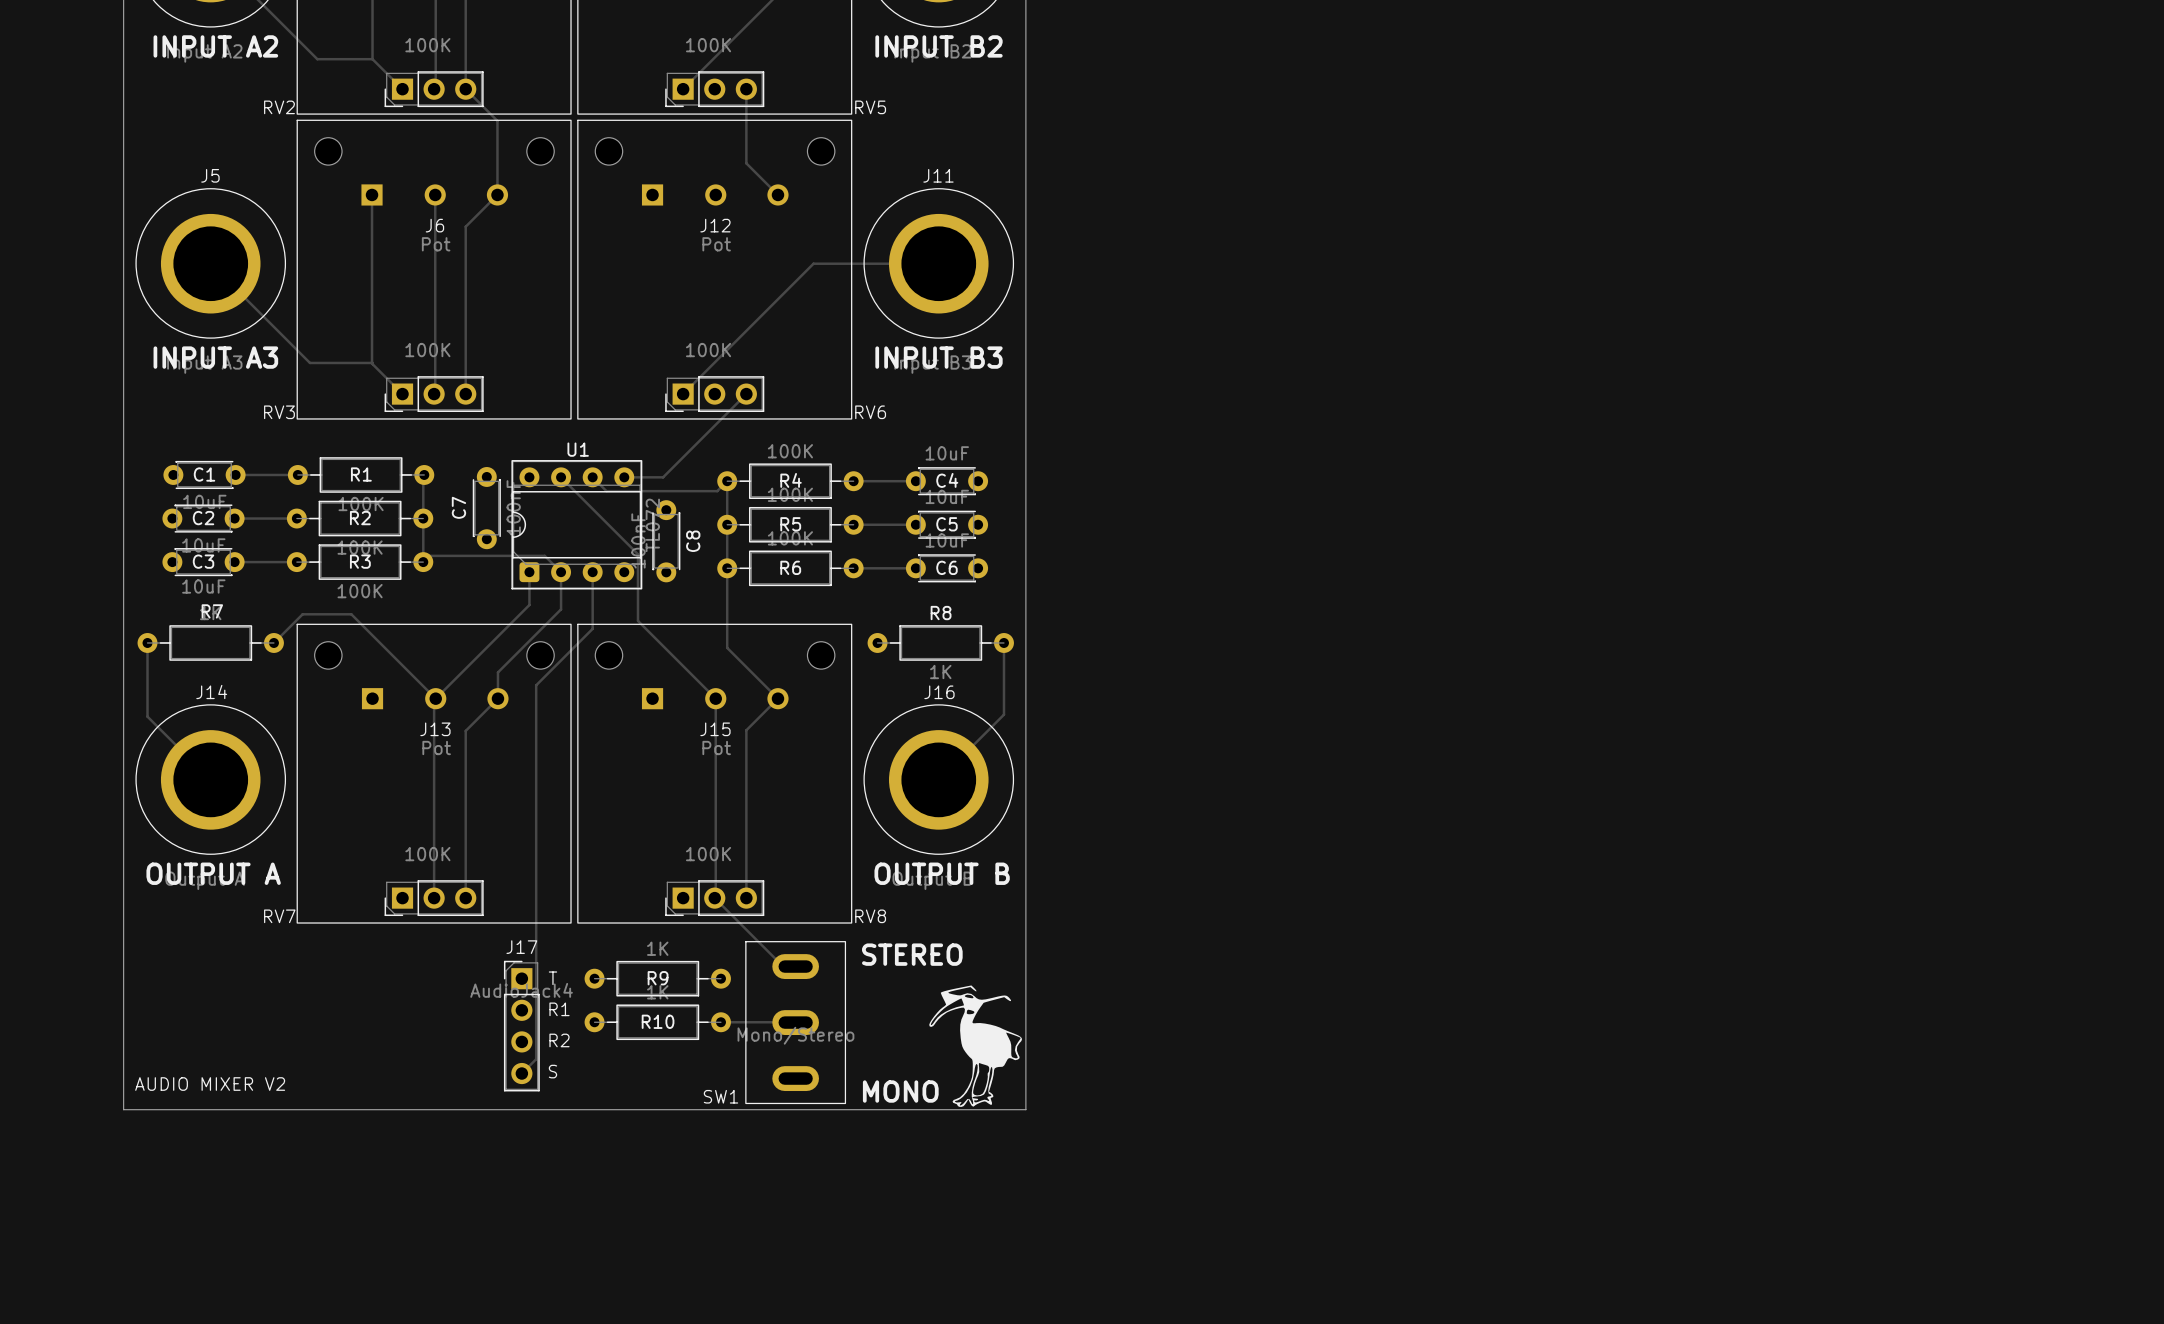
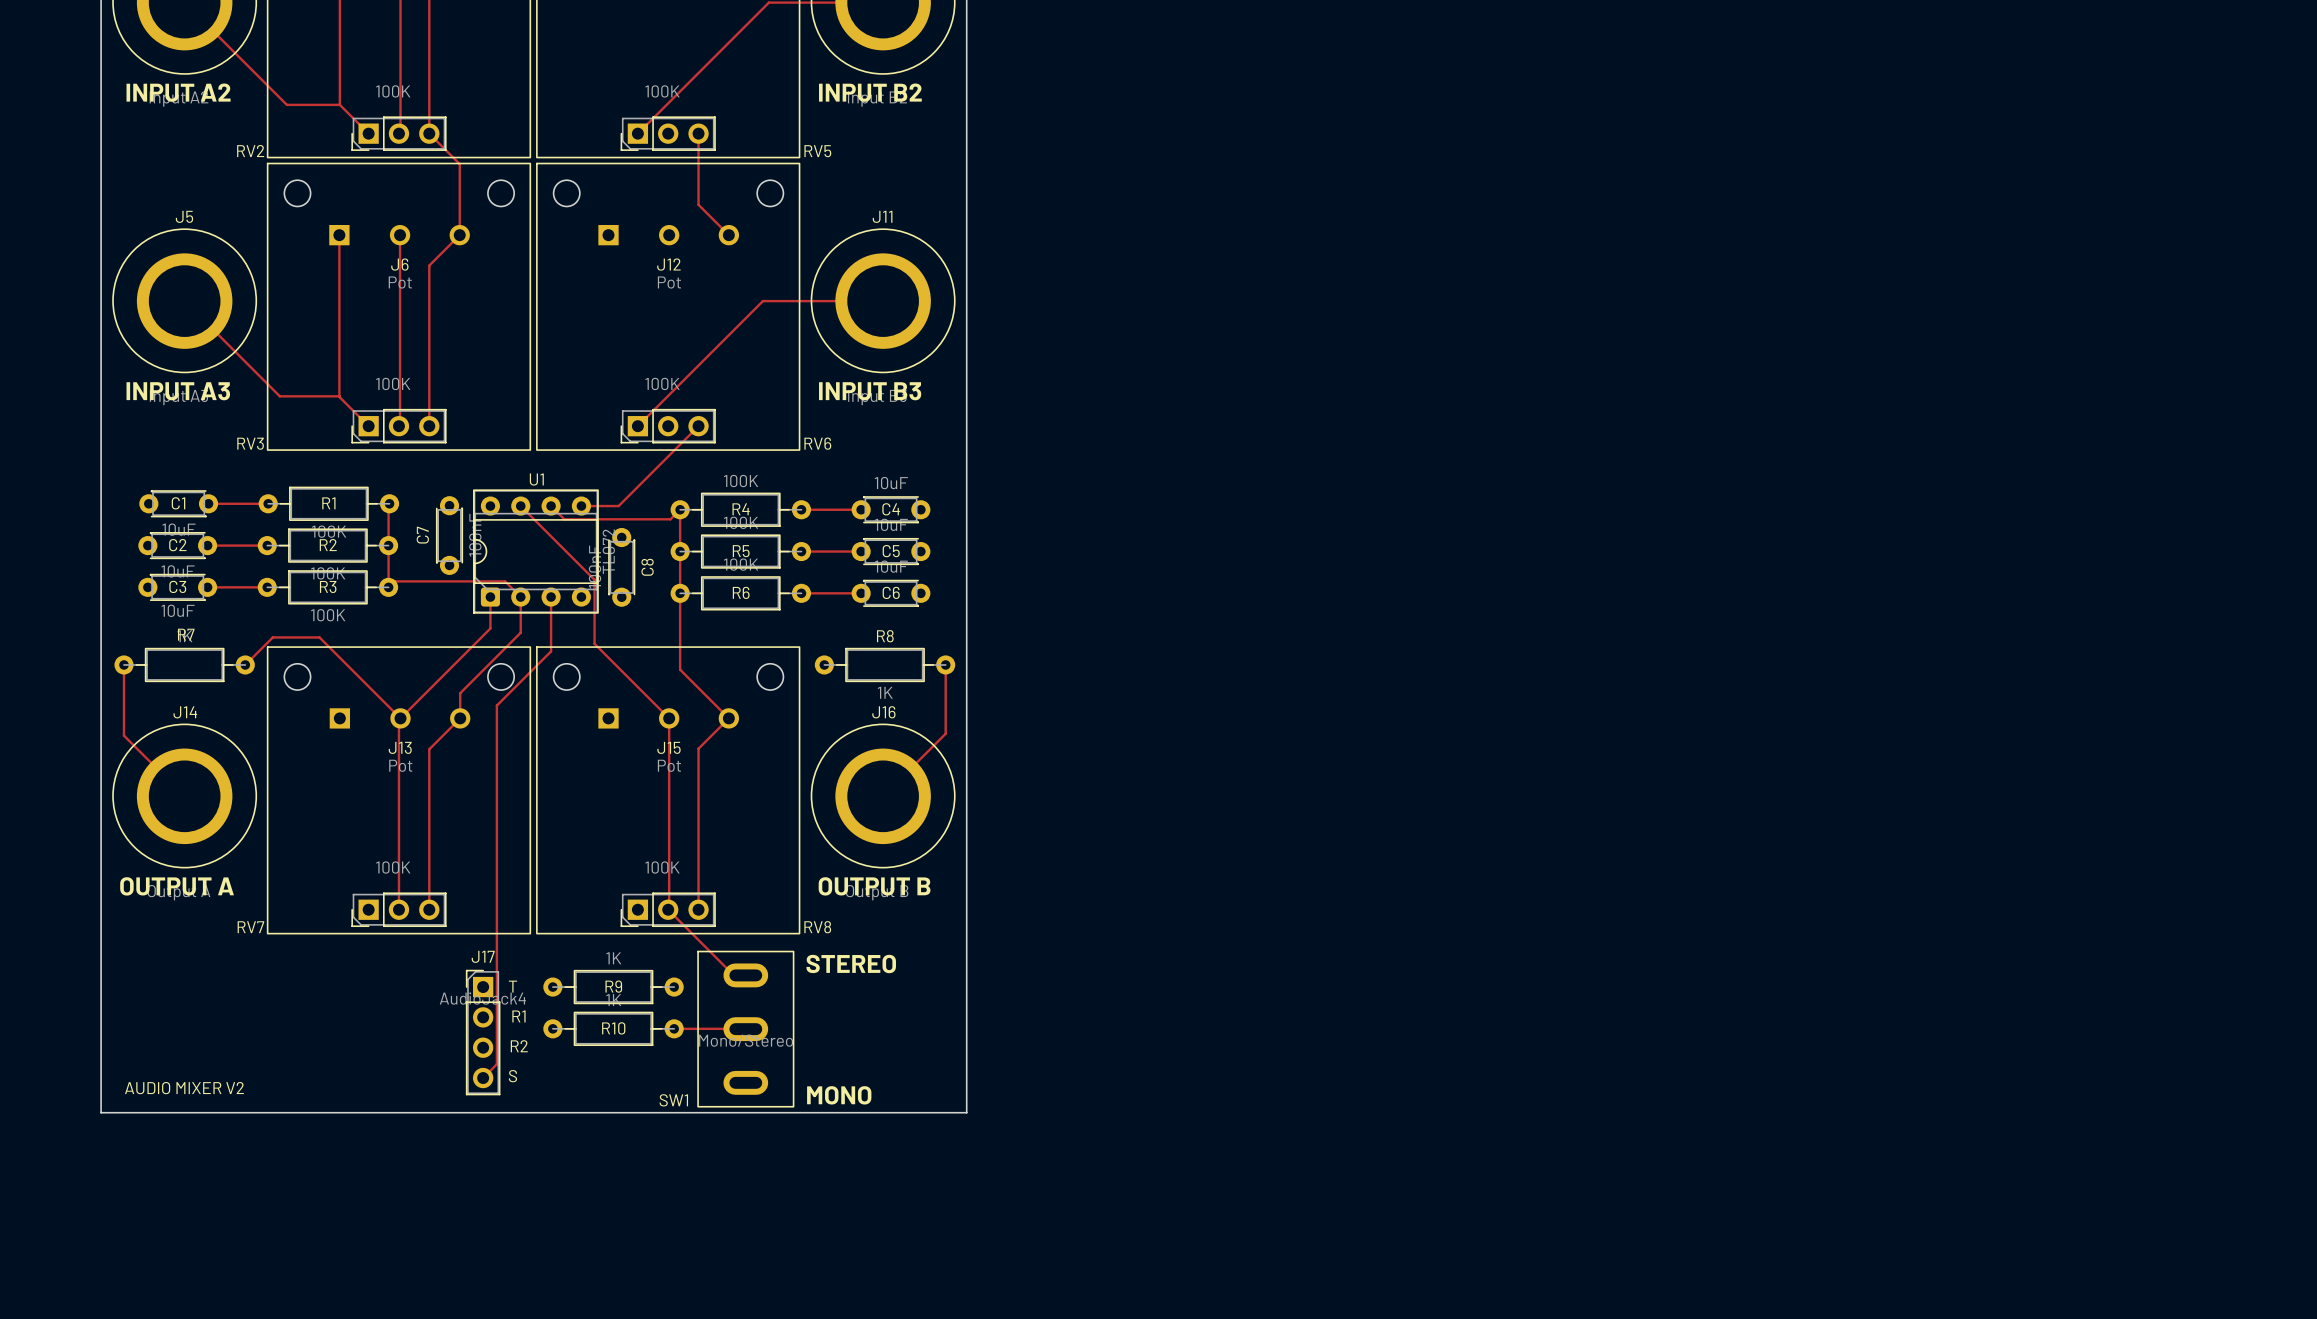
drawing: [929, 985, 1023, 1107] -> none

